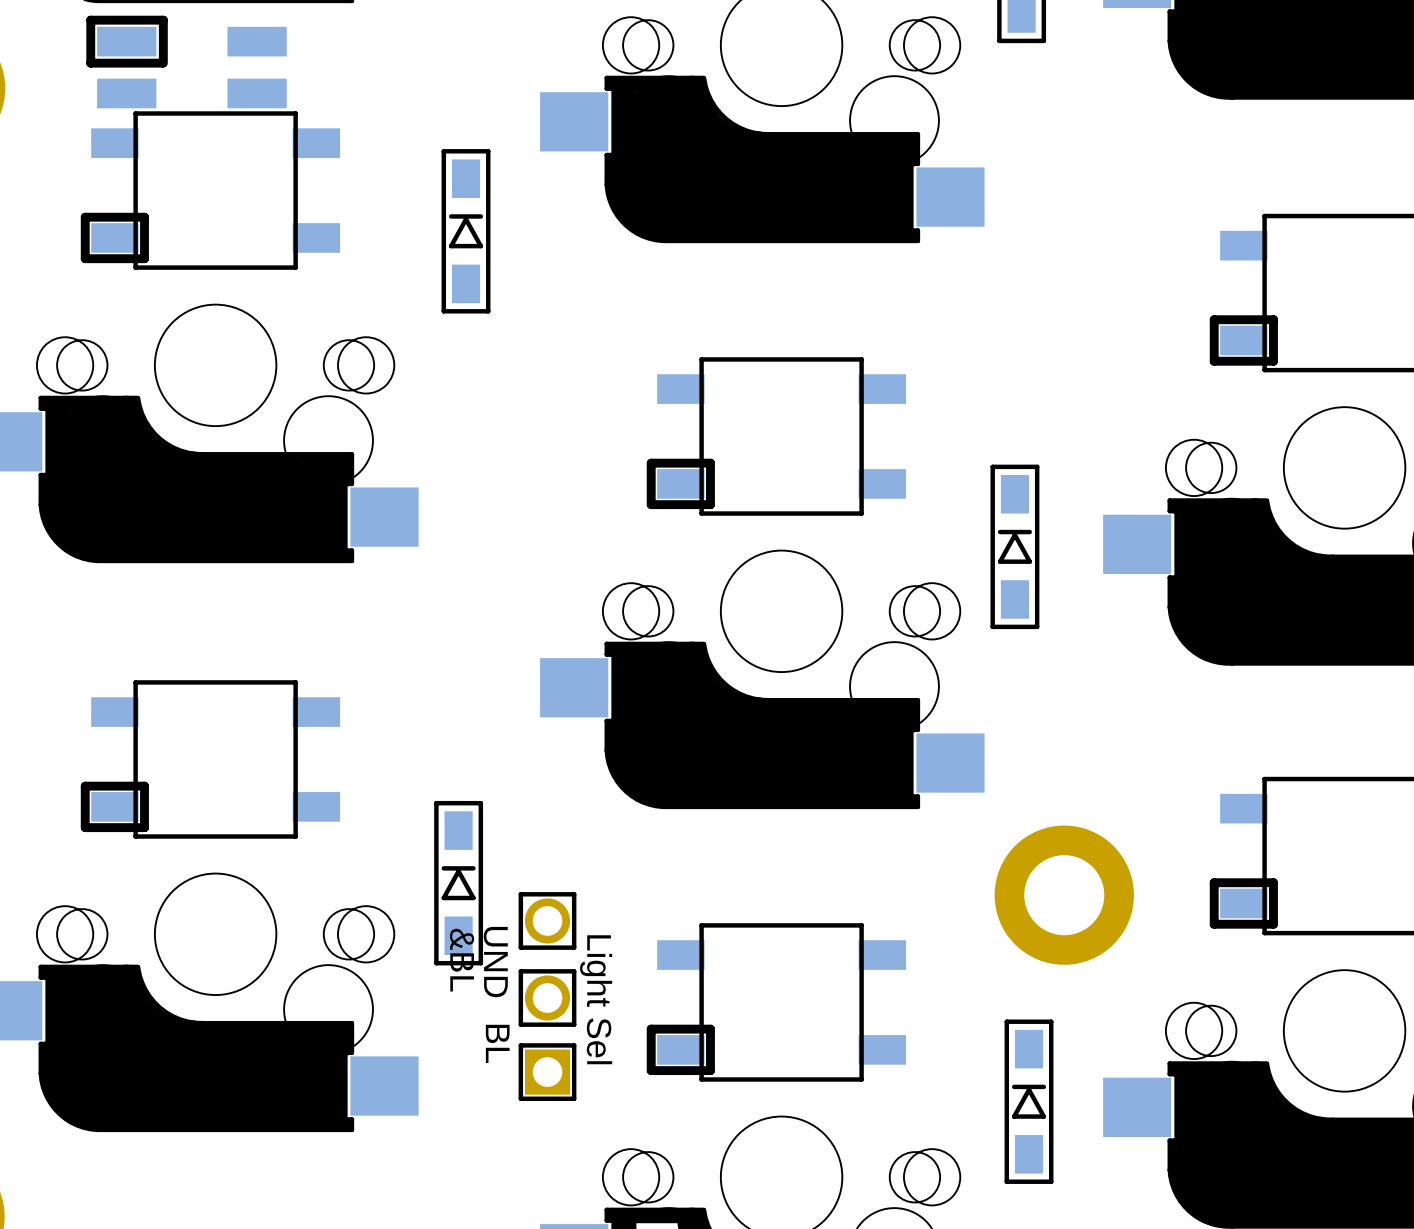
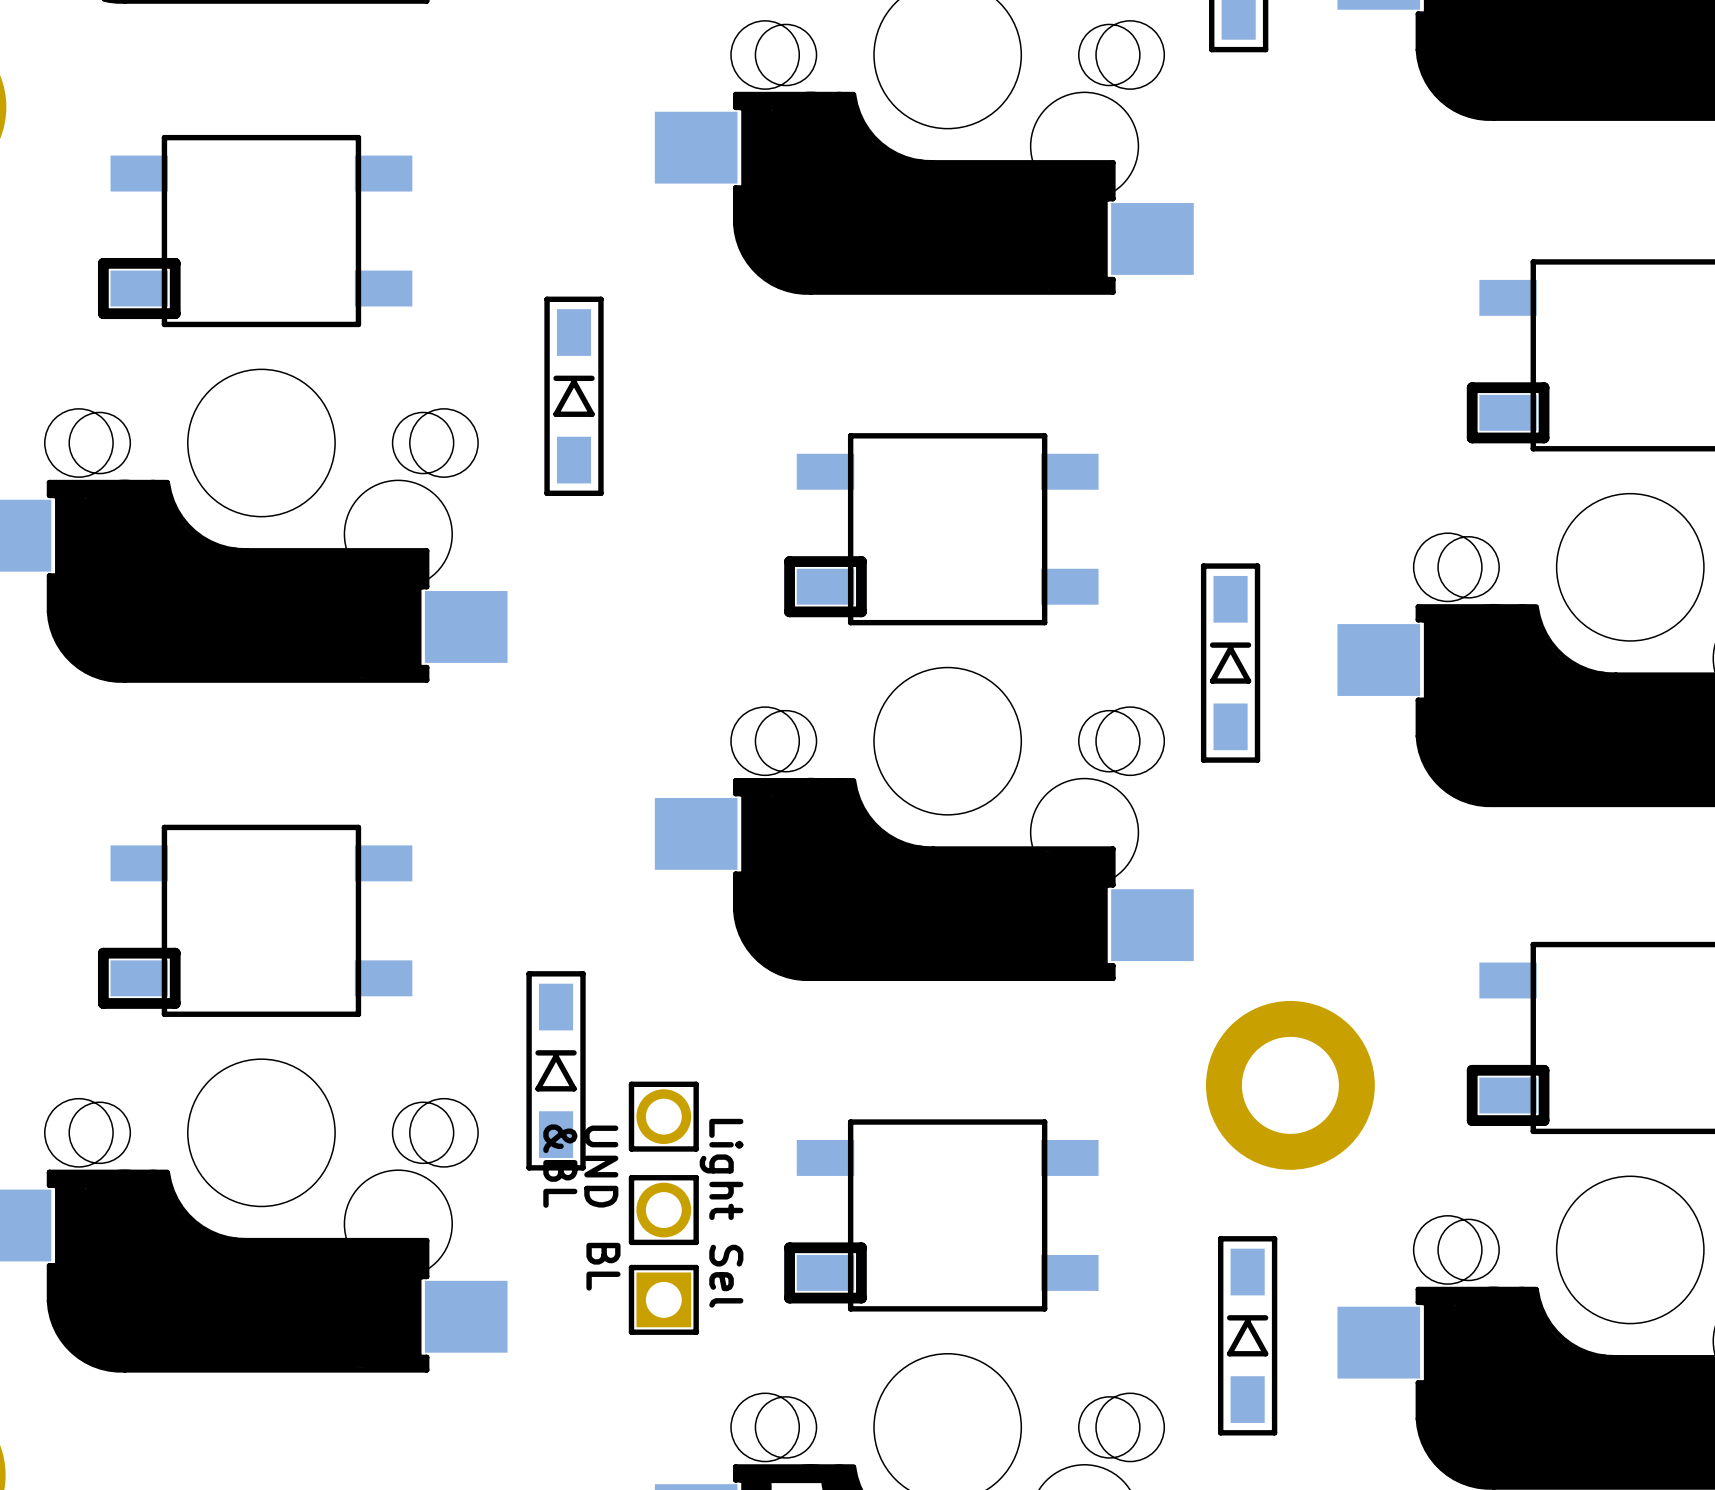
part: (186, 62) -> none
part position: (466, 231) -> (574, 396)

